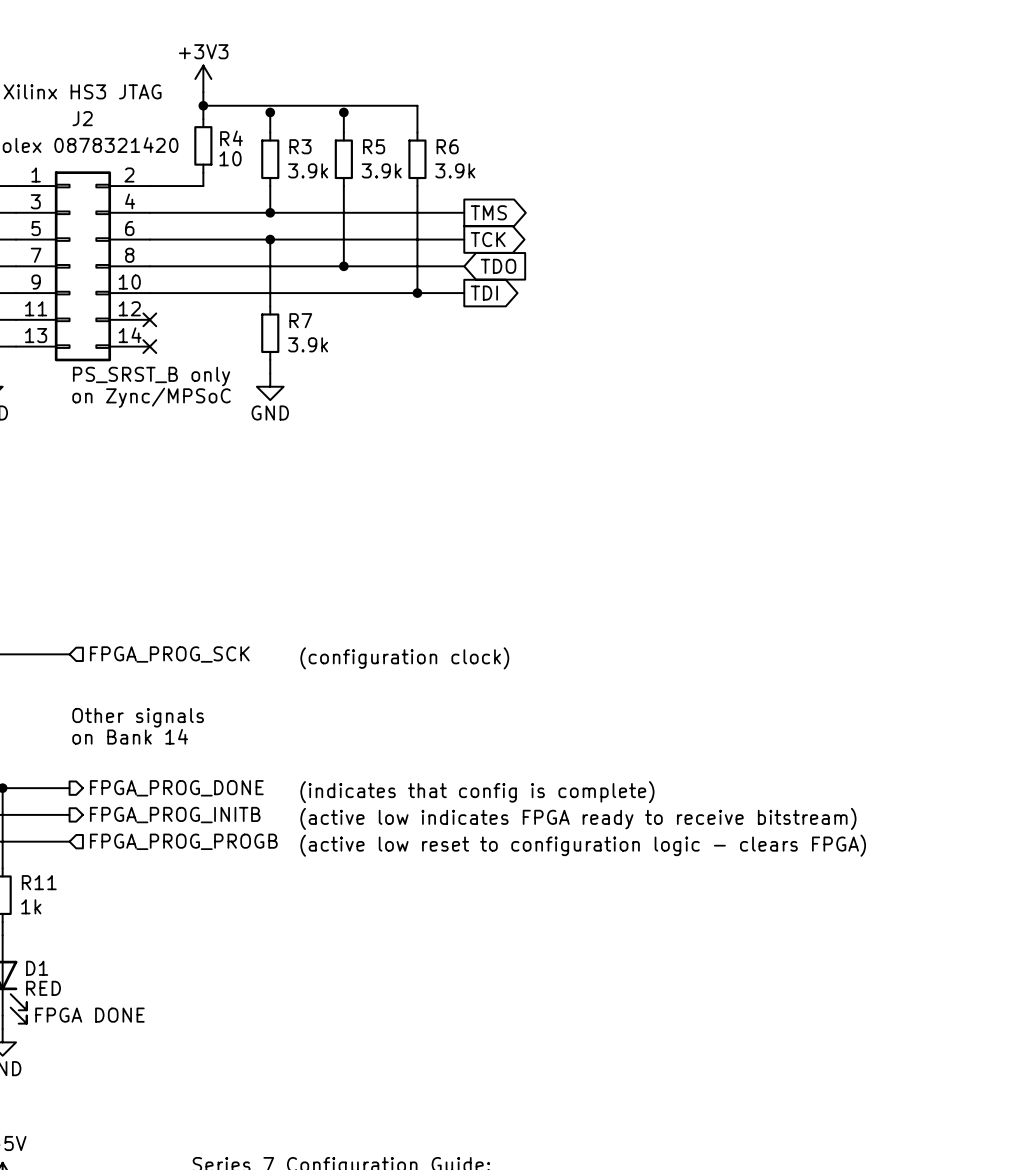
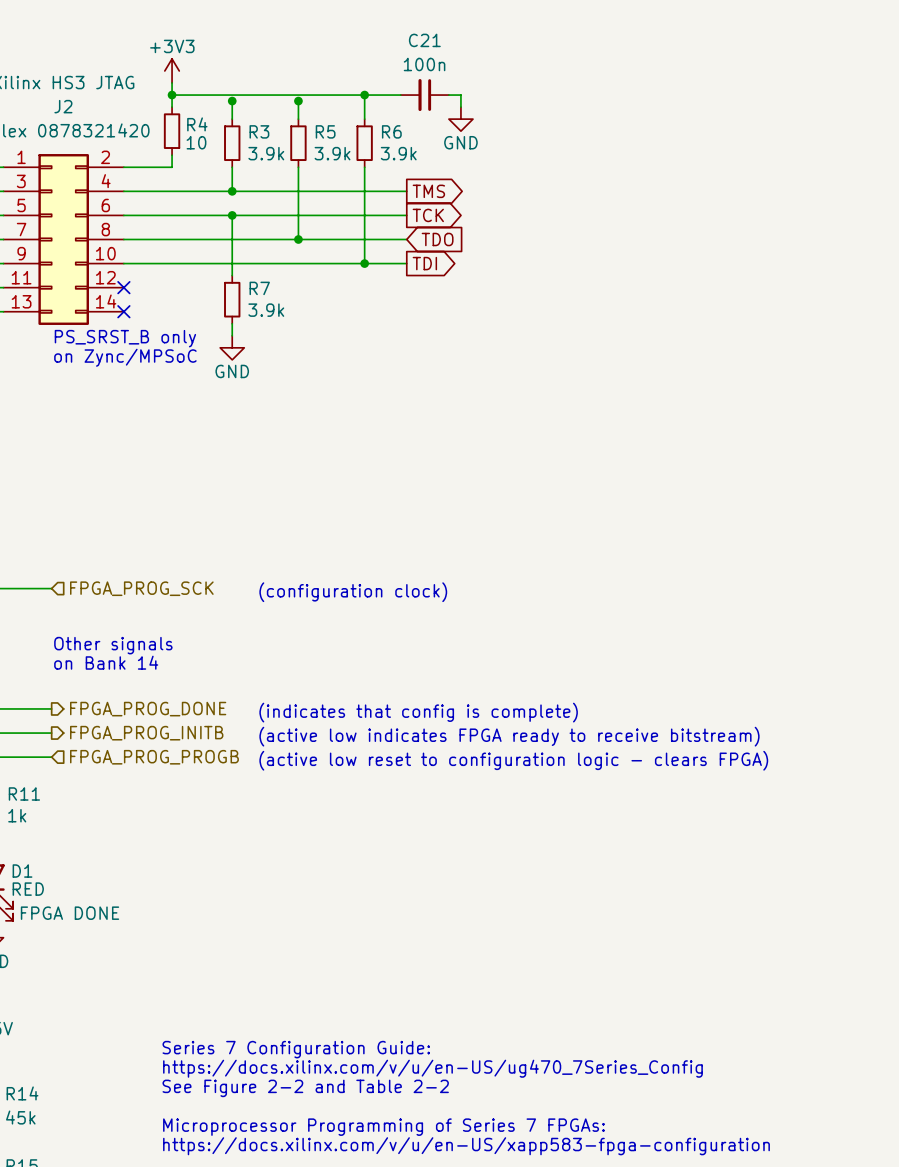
wire: none -> (364, 95) (400, 95)
junction: none -> (364, 95)
C21: none -> 100n (424, 95)
wire: none -> (448, 95) (460, 95) (460, 107)
power symbol: none -> GND (460, 119)

